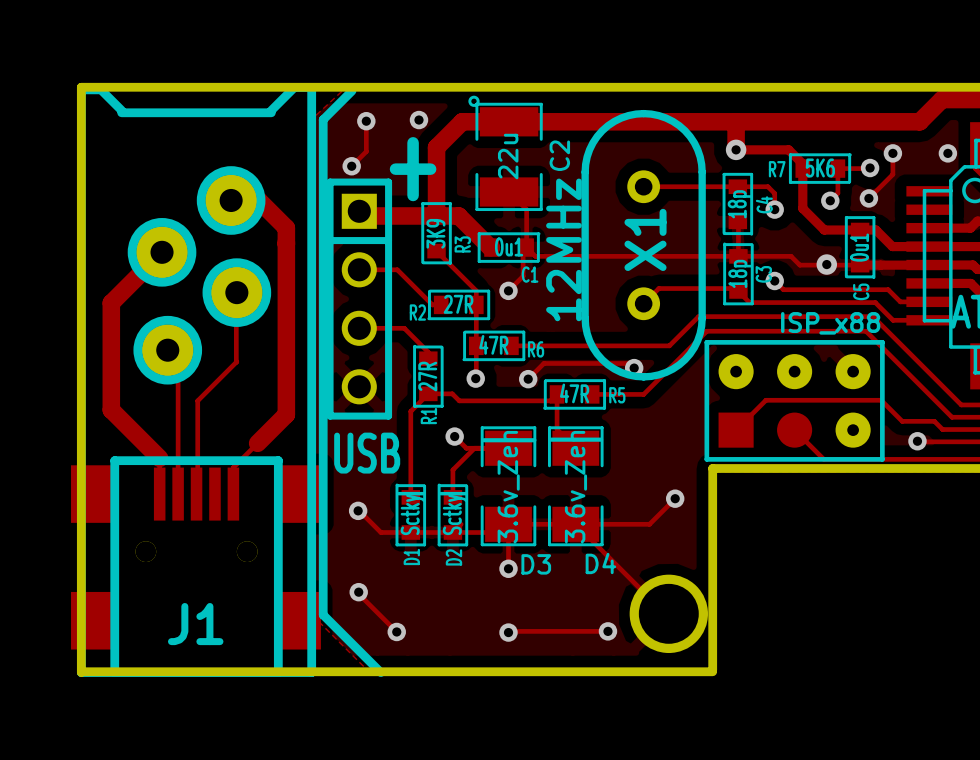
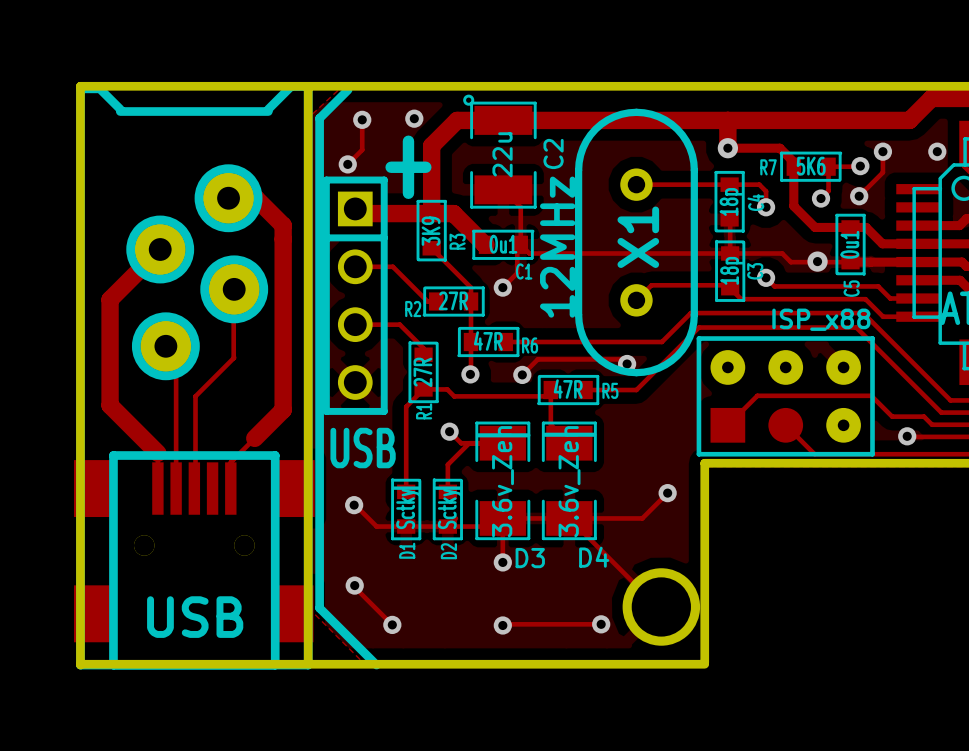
board edge: none -> (308, 86) (308, 662)
J1: (196, 566) -> none
USB: none -> (194, 560)

